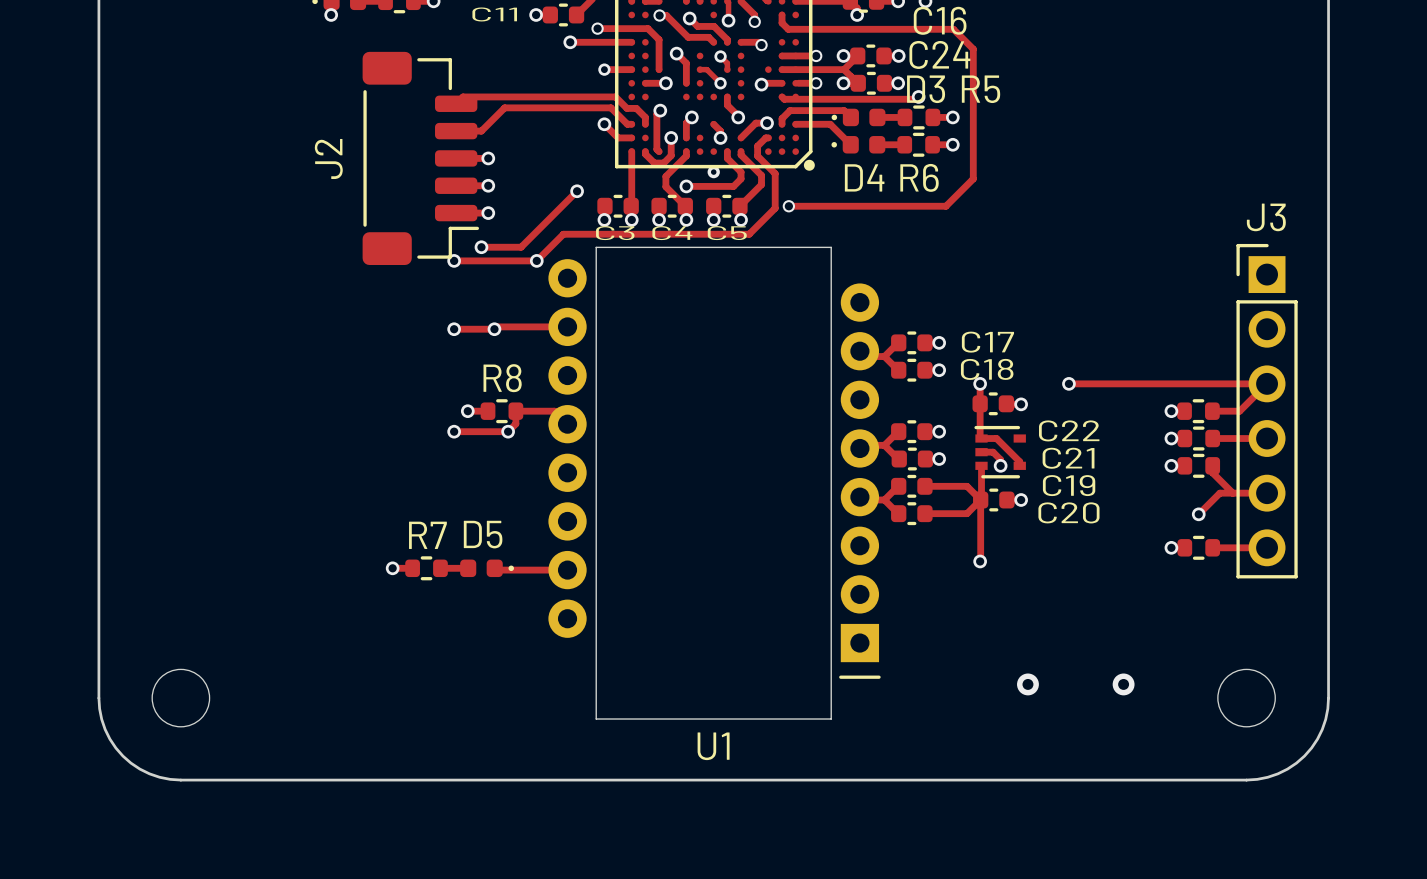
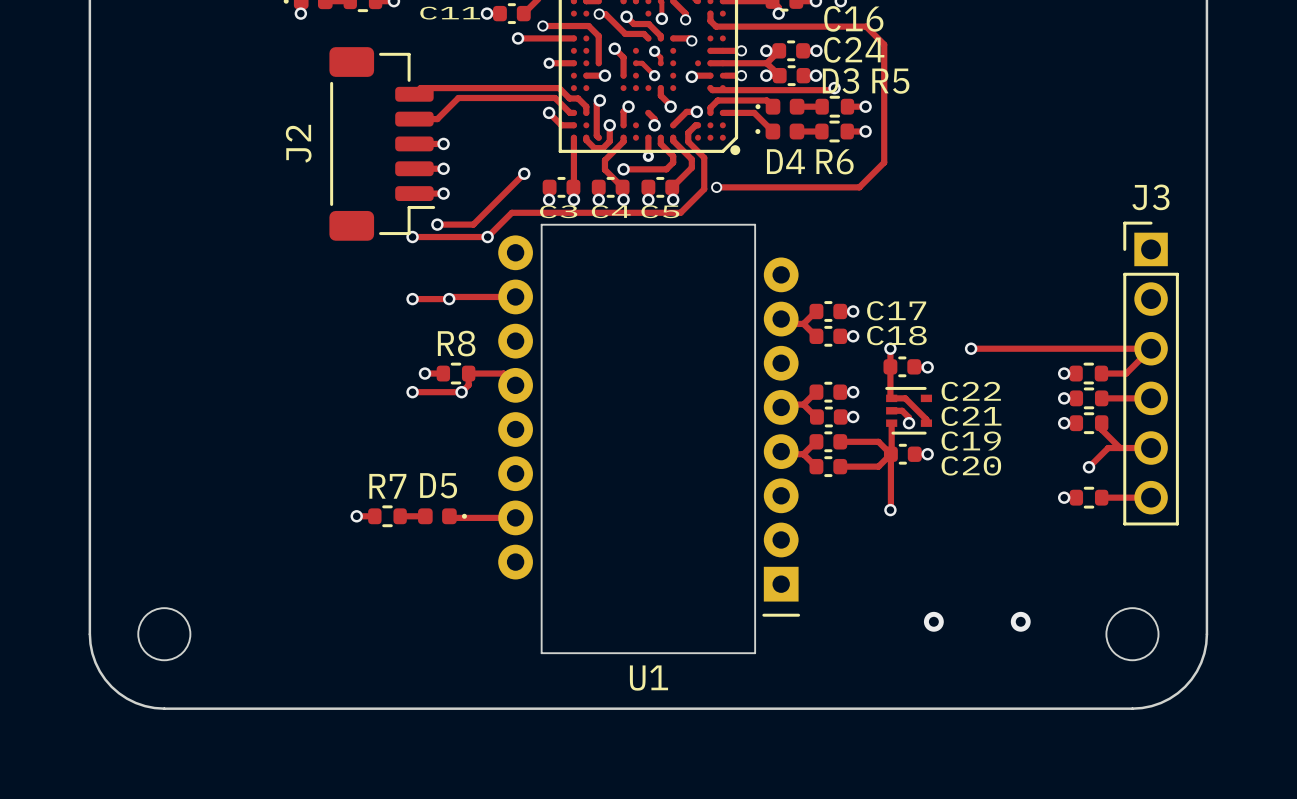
track: none -> (648, 137) (648, 156)

